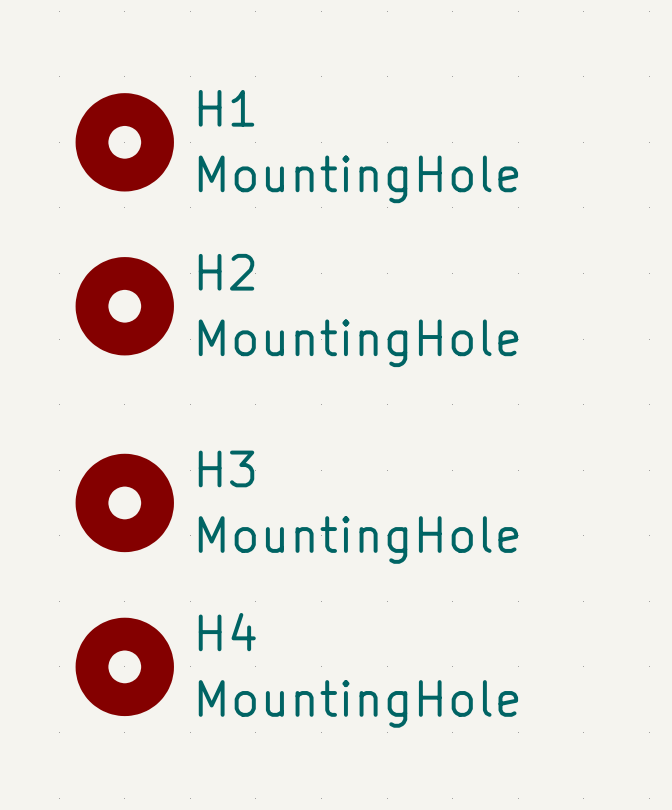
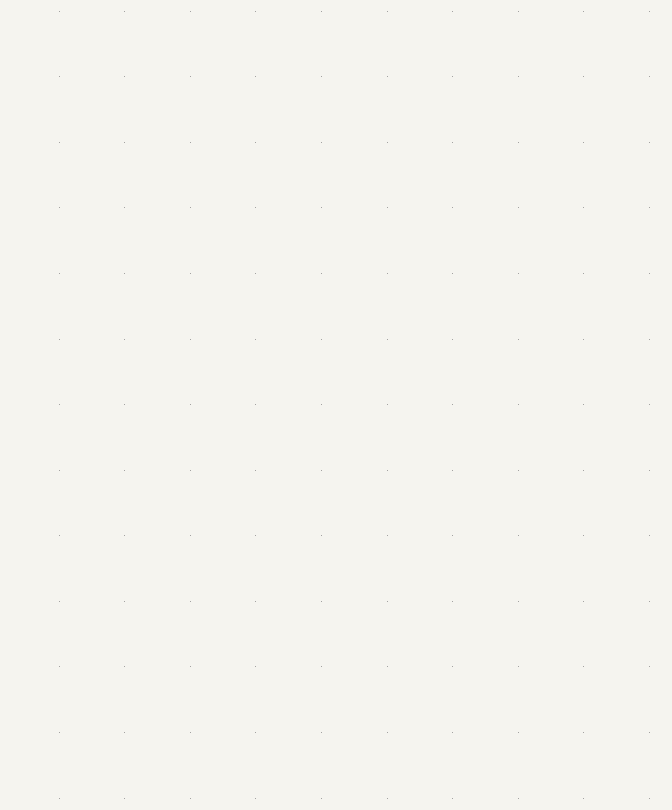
H1: MountingHole (124, 142) -> none
H2: MountingHole (124, 306) -> none
H3: MountingHole (124, 502) -> none
H4: MountingHole (124, 666) -> none

